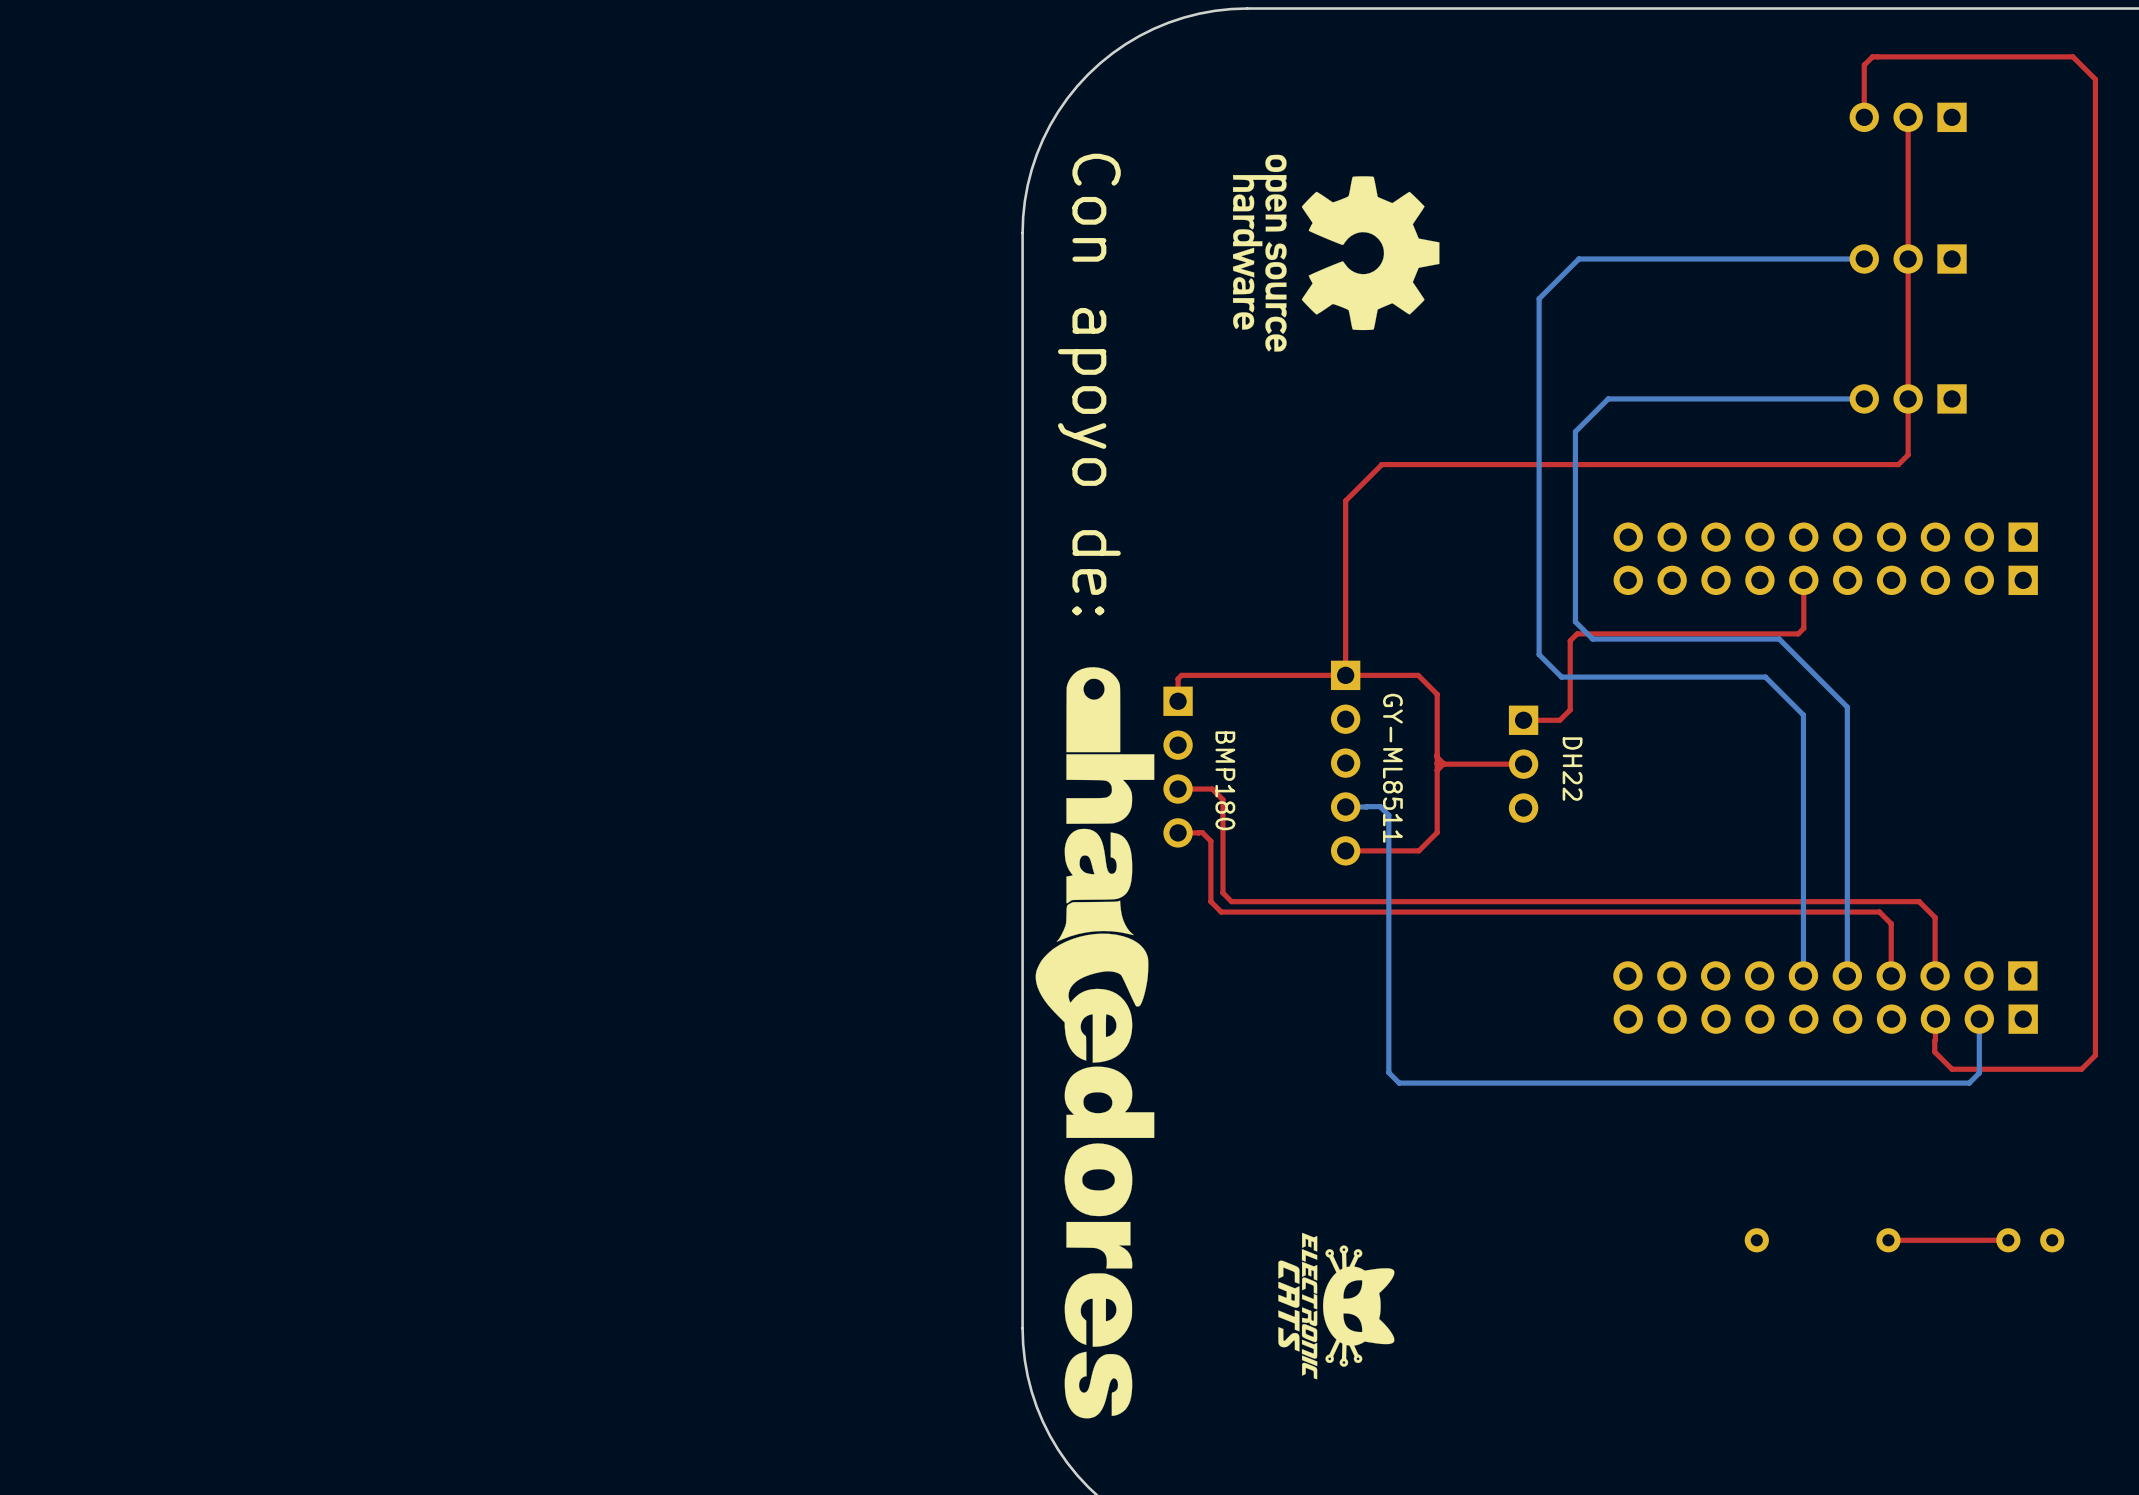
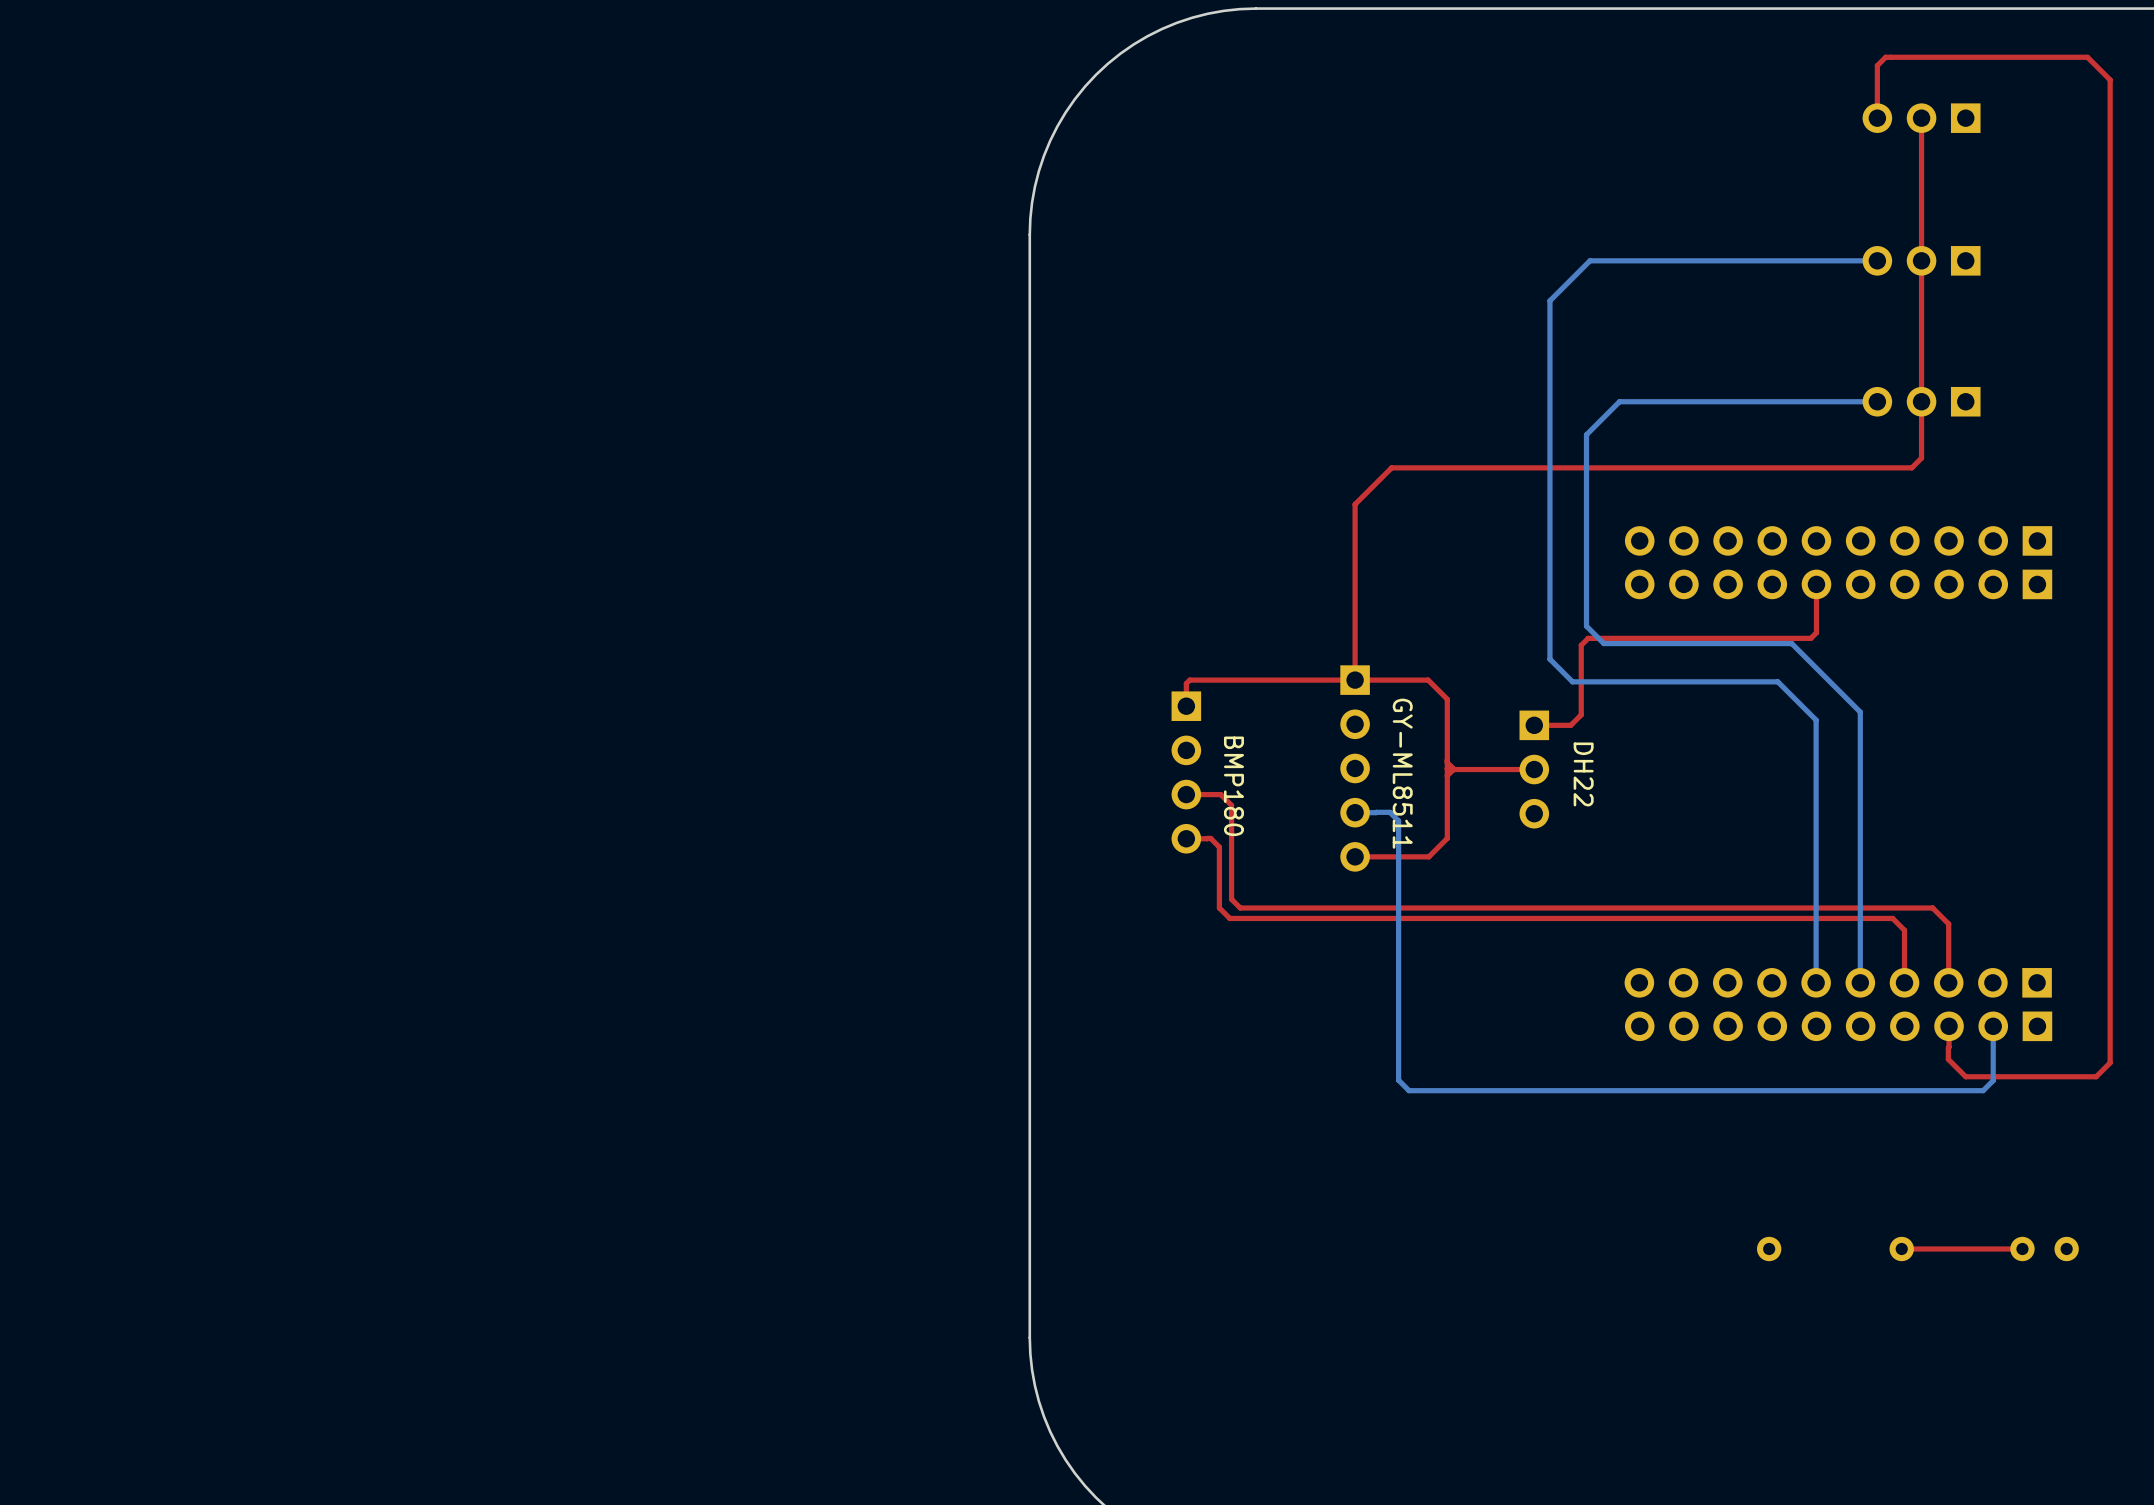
drawing: [1232, 154, 1440, 352] -> none
text: Con apoyo de: (1089, 384) -> none
drawing: [1035, 667, 1155, 1419] -> none
drawing: [1278, 1232, 1395, 1380] -> none

